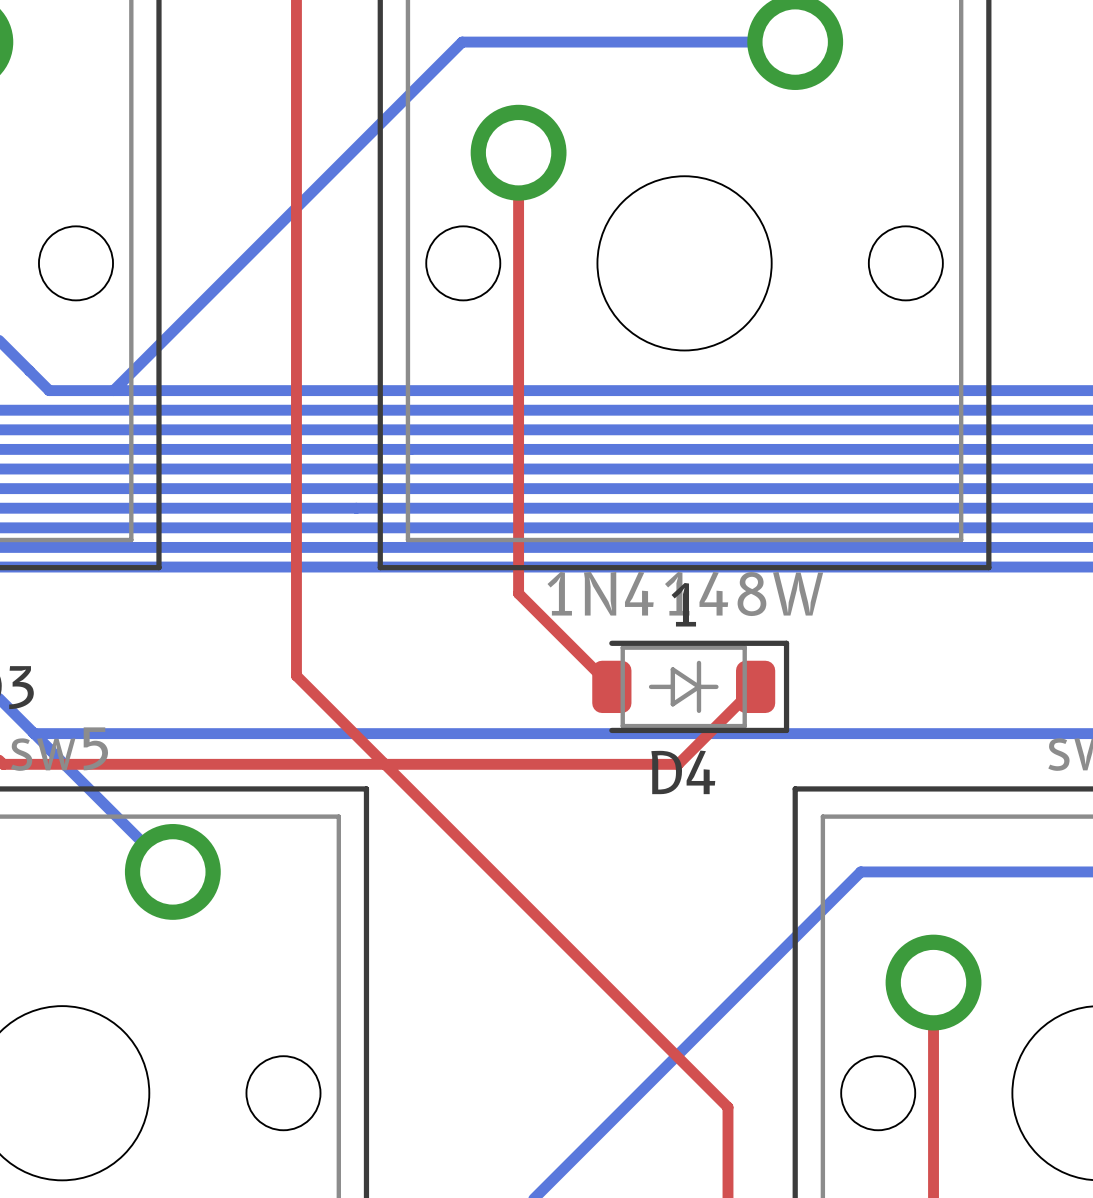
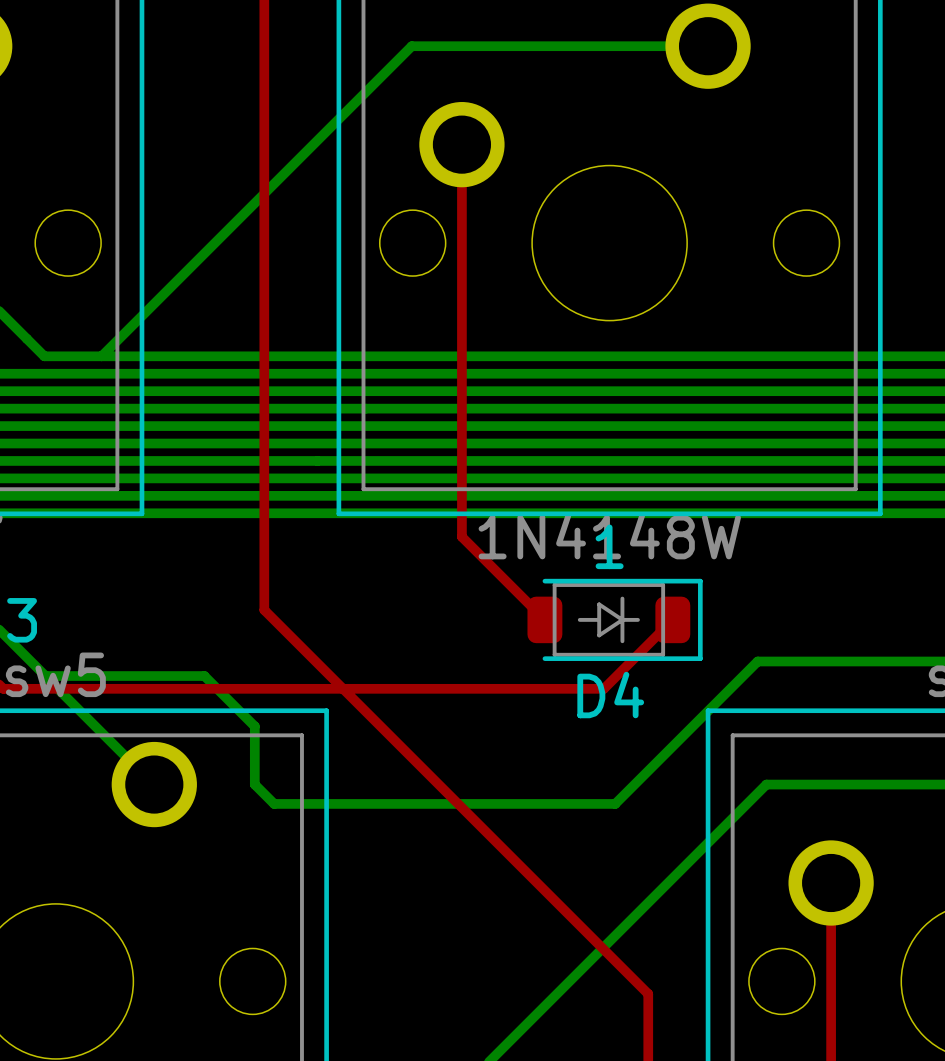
bottom track: (34, 733) (851, 733) -> (45, 676) (204, 676) (254, 726) (254, 784) (274, 803) (615, 803) (757, 661)

